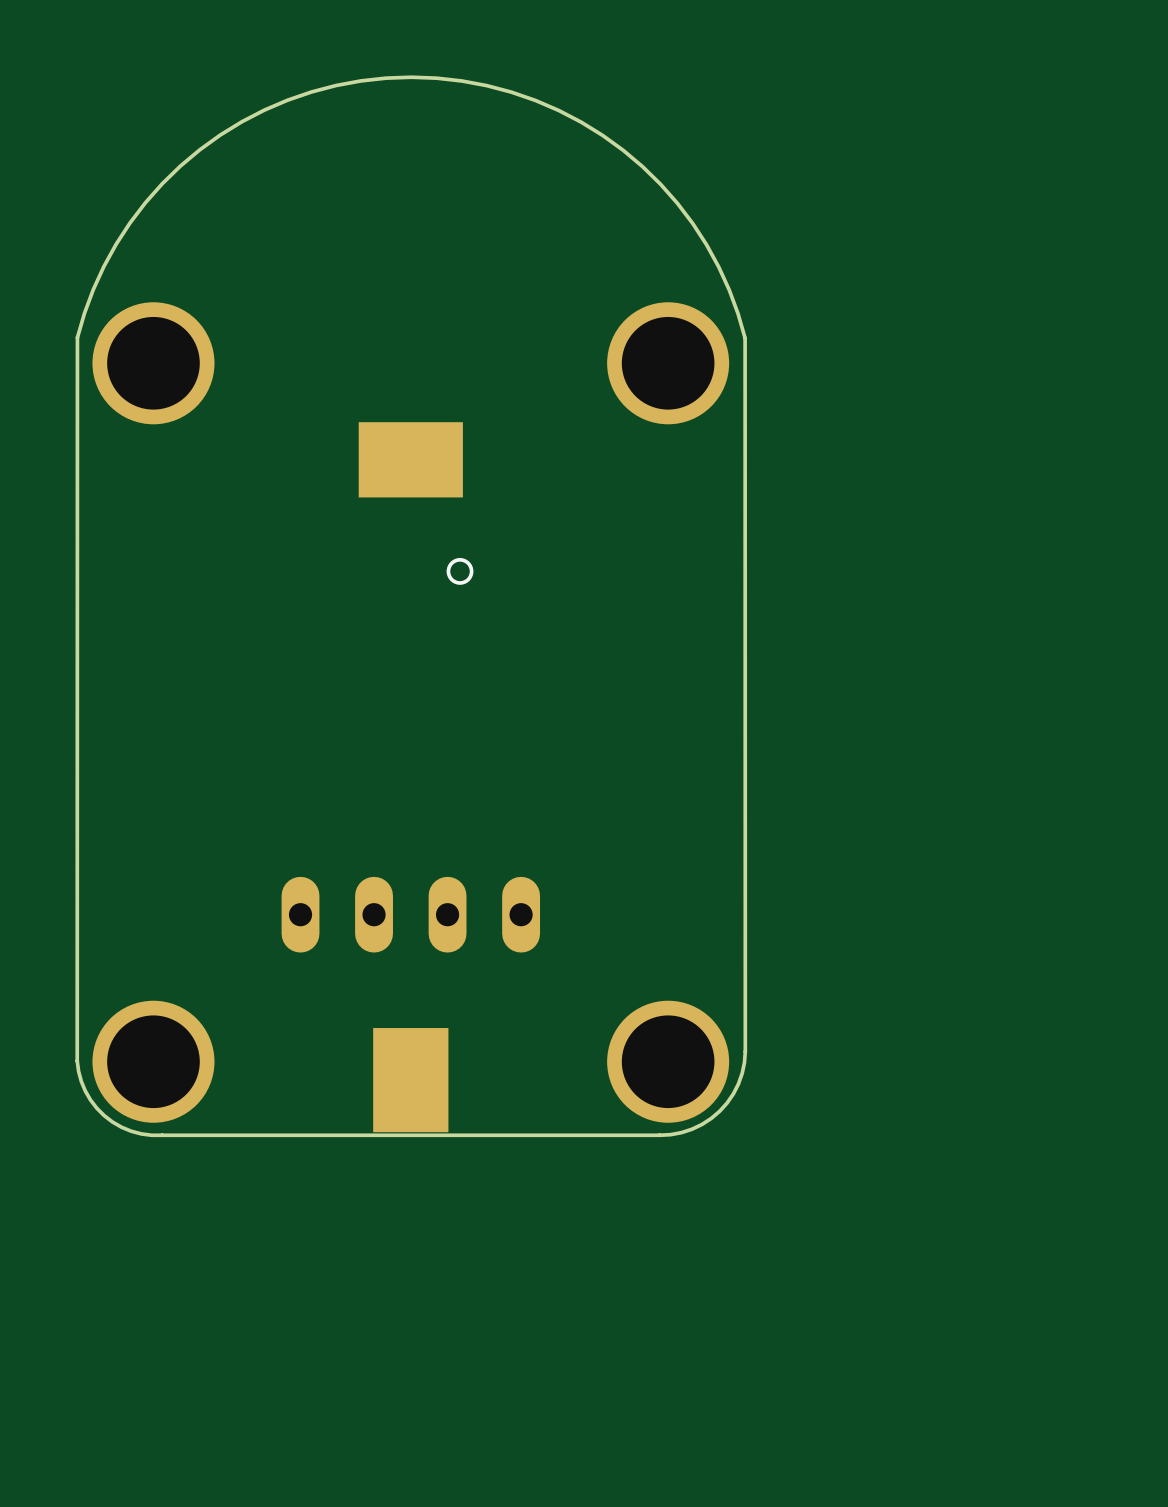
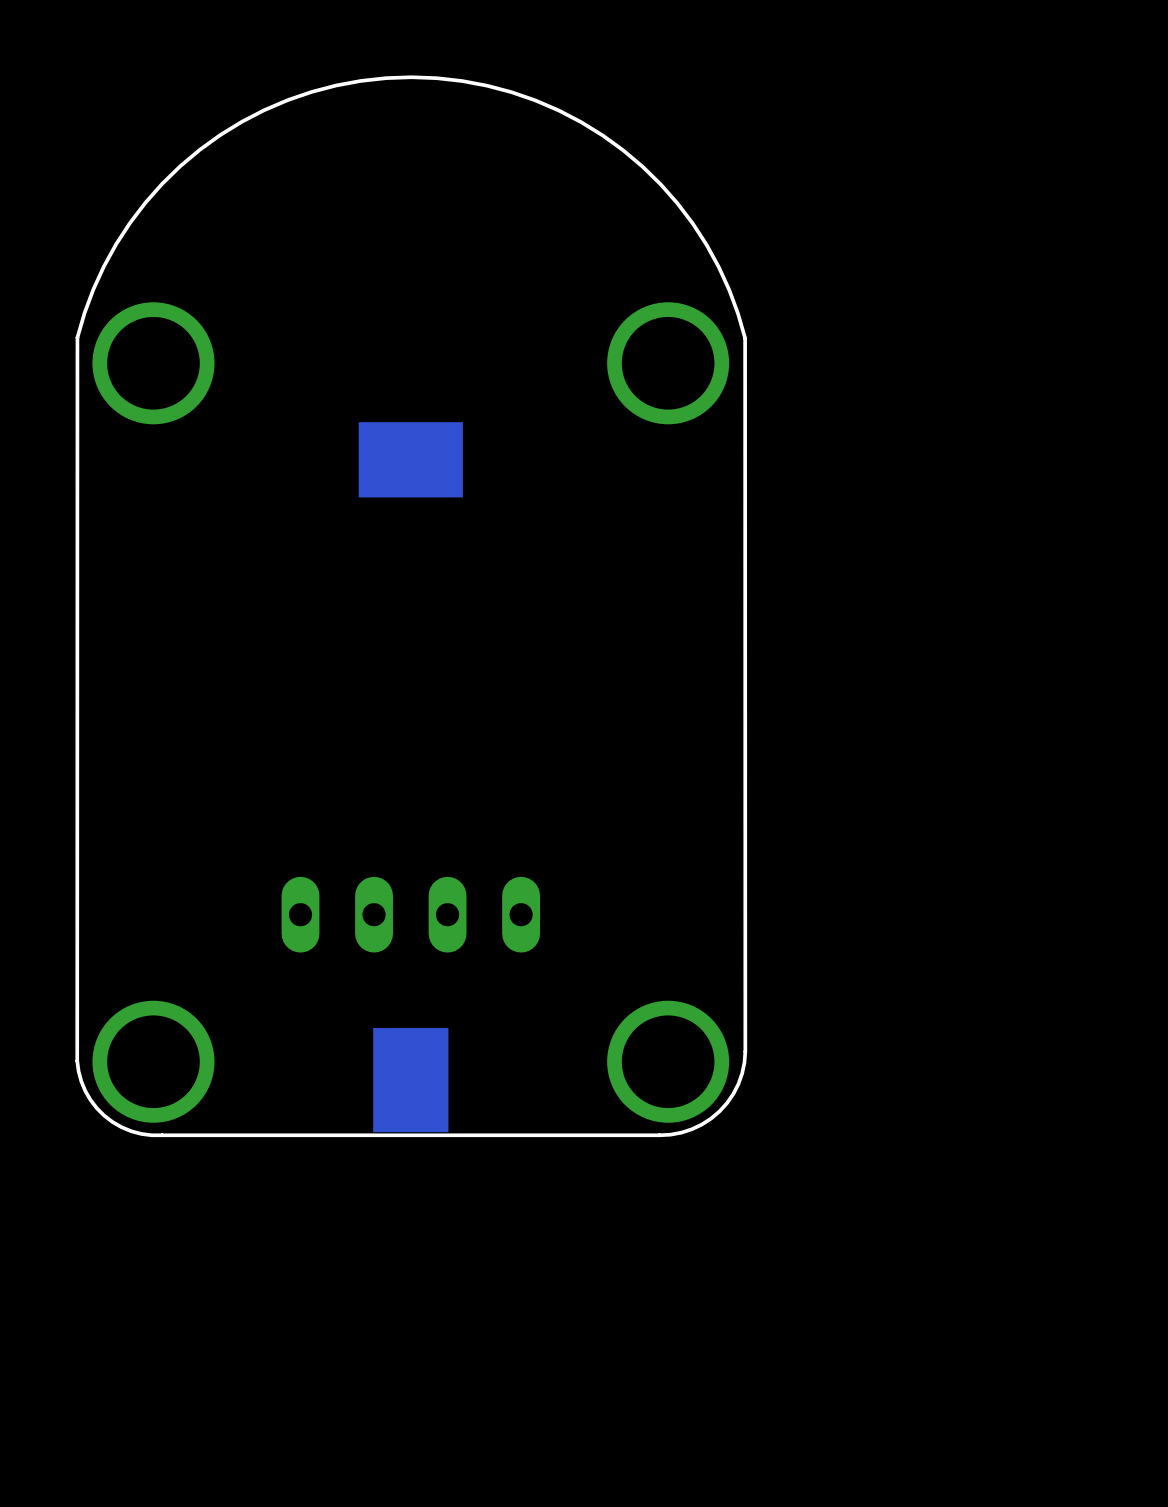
part: (460, 571) -> none

